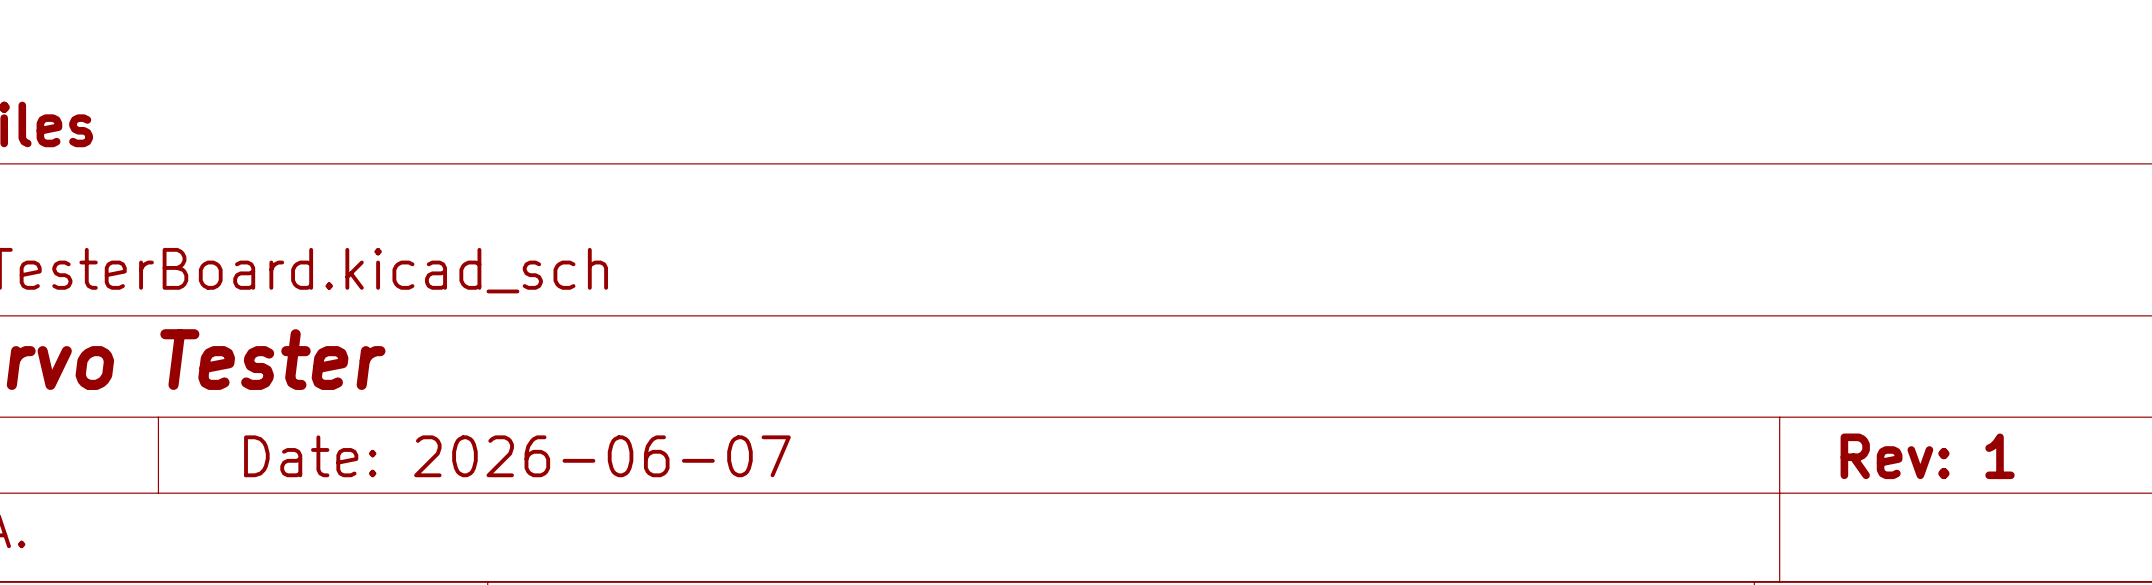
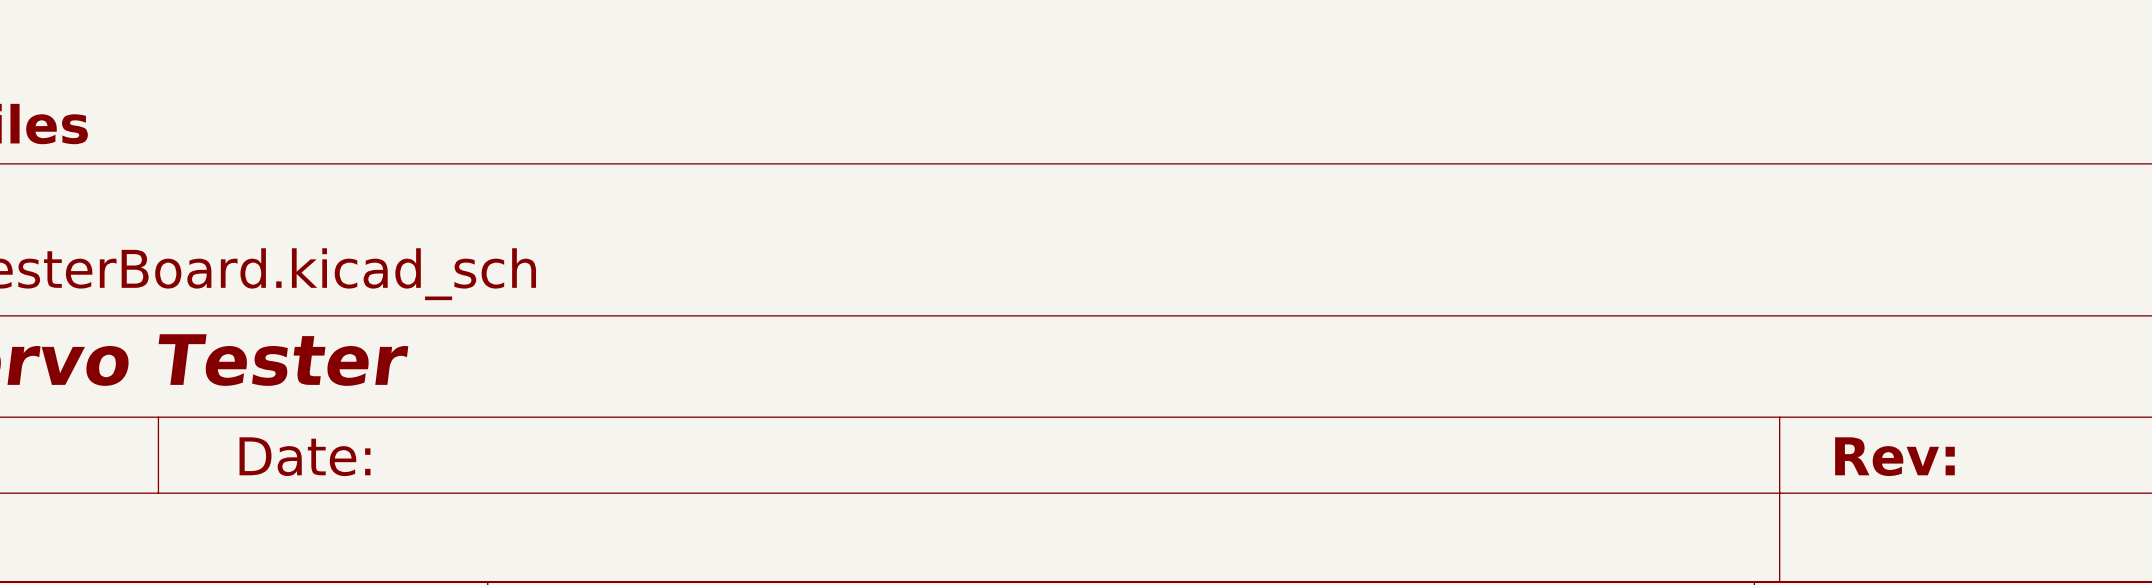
title block: Date: 2026-06-07 (517, 456) -> Date: (305, 456)
title block: Rev: 1 (1927, 456) -> Rev: (1894, 456)

